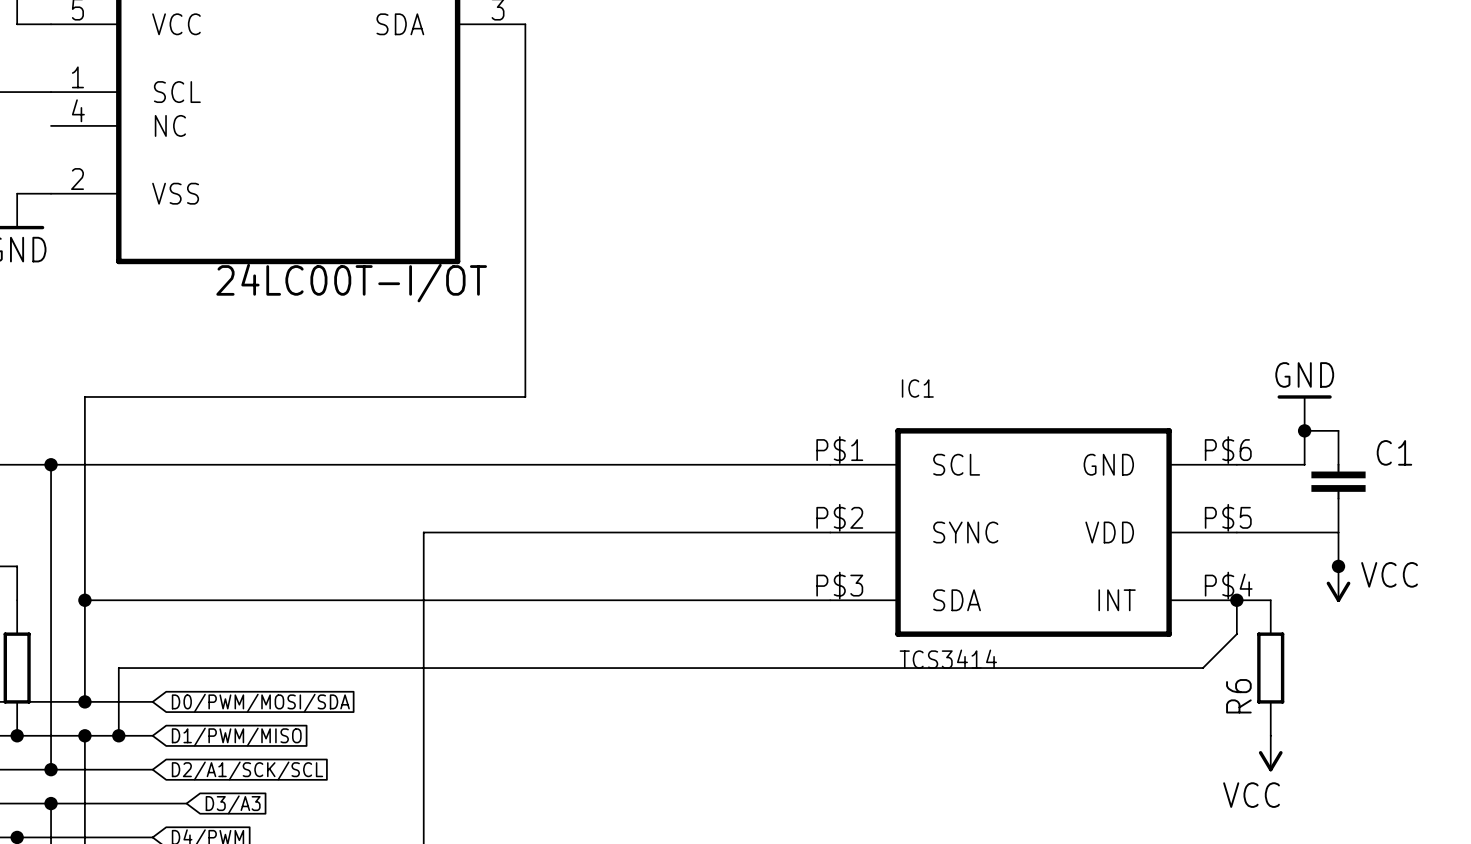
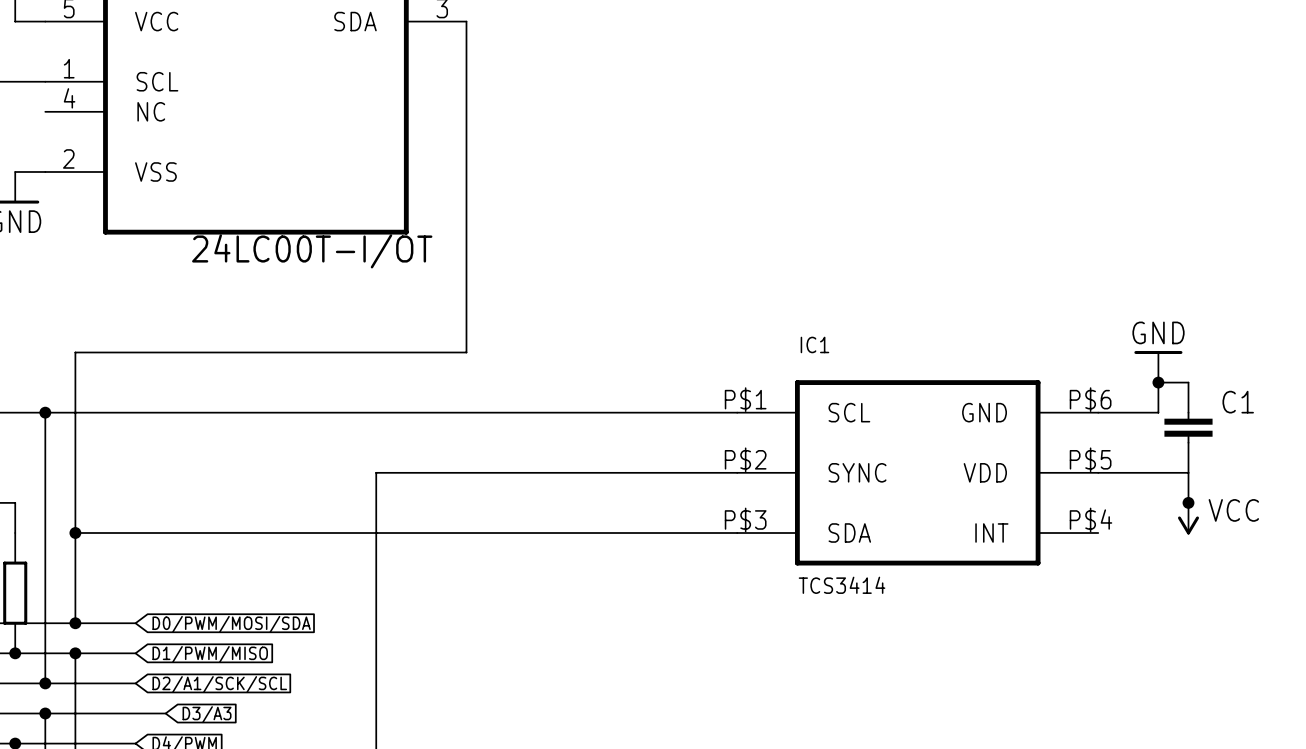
junction: (1236, 600) -> none
wire: (1270, 600) (1236, 600) (1236, 634) (1202, 668) (118, 668) (118, 735) -> none
R6: (1270, 668) -> none
junction: (118, 735) -> none
power symbol: VCC (1270, 753) -> none

